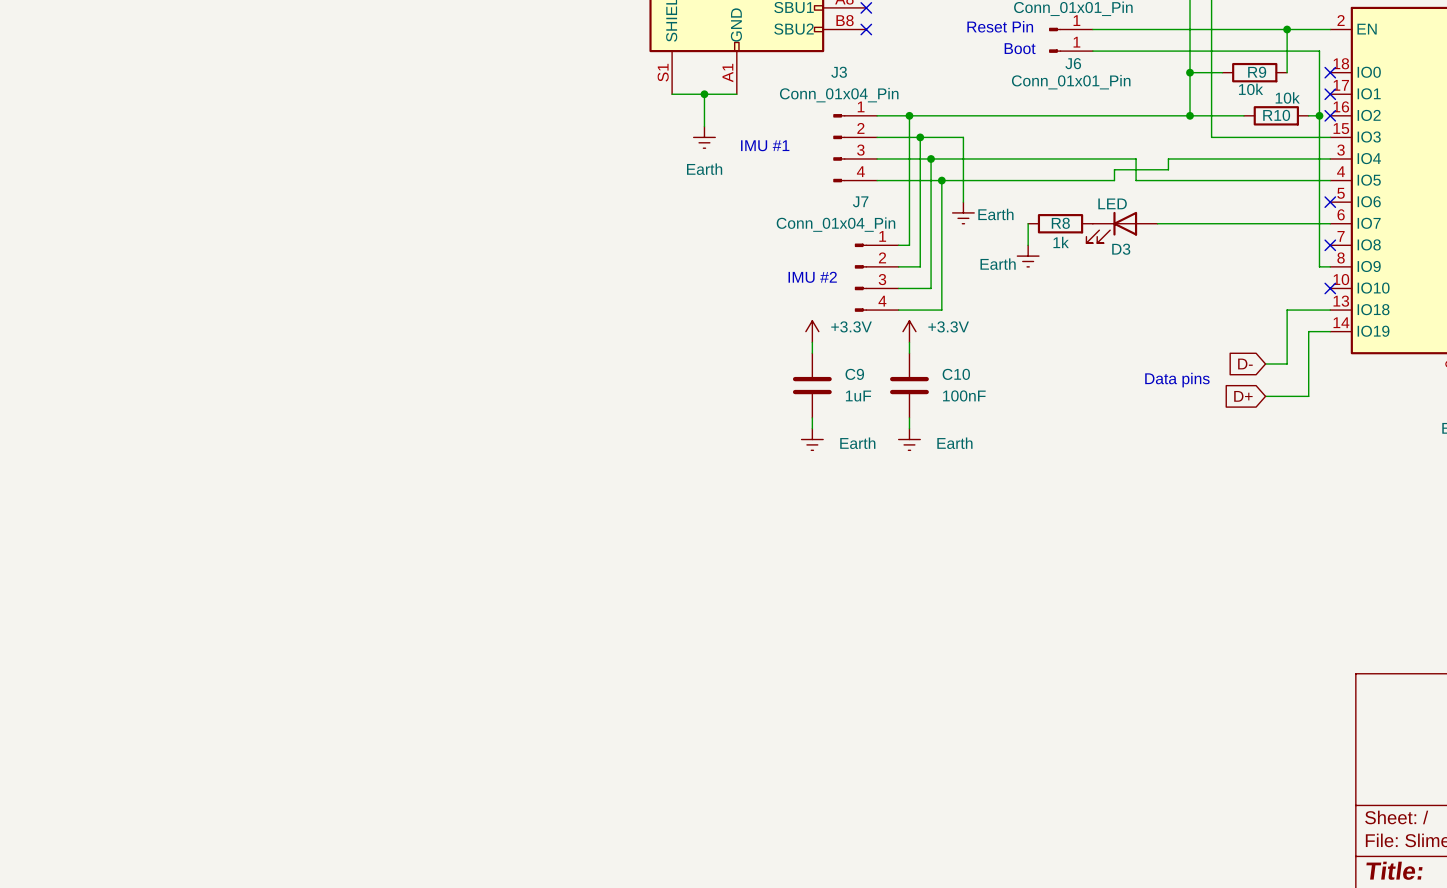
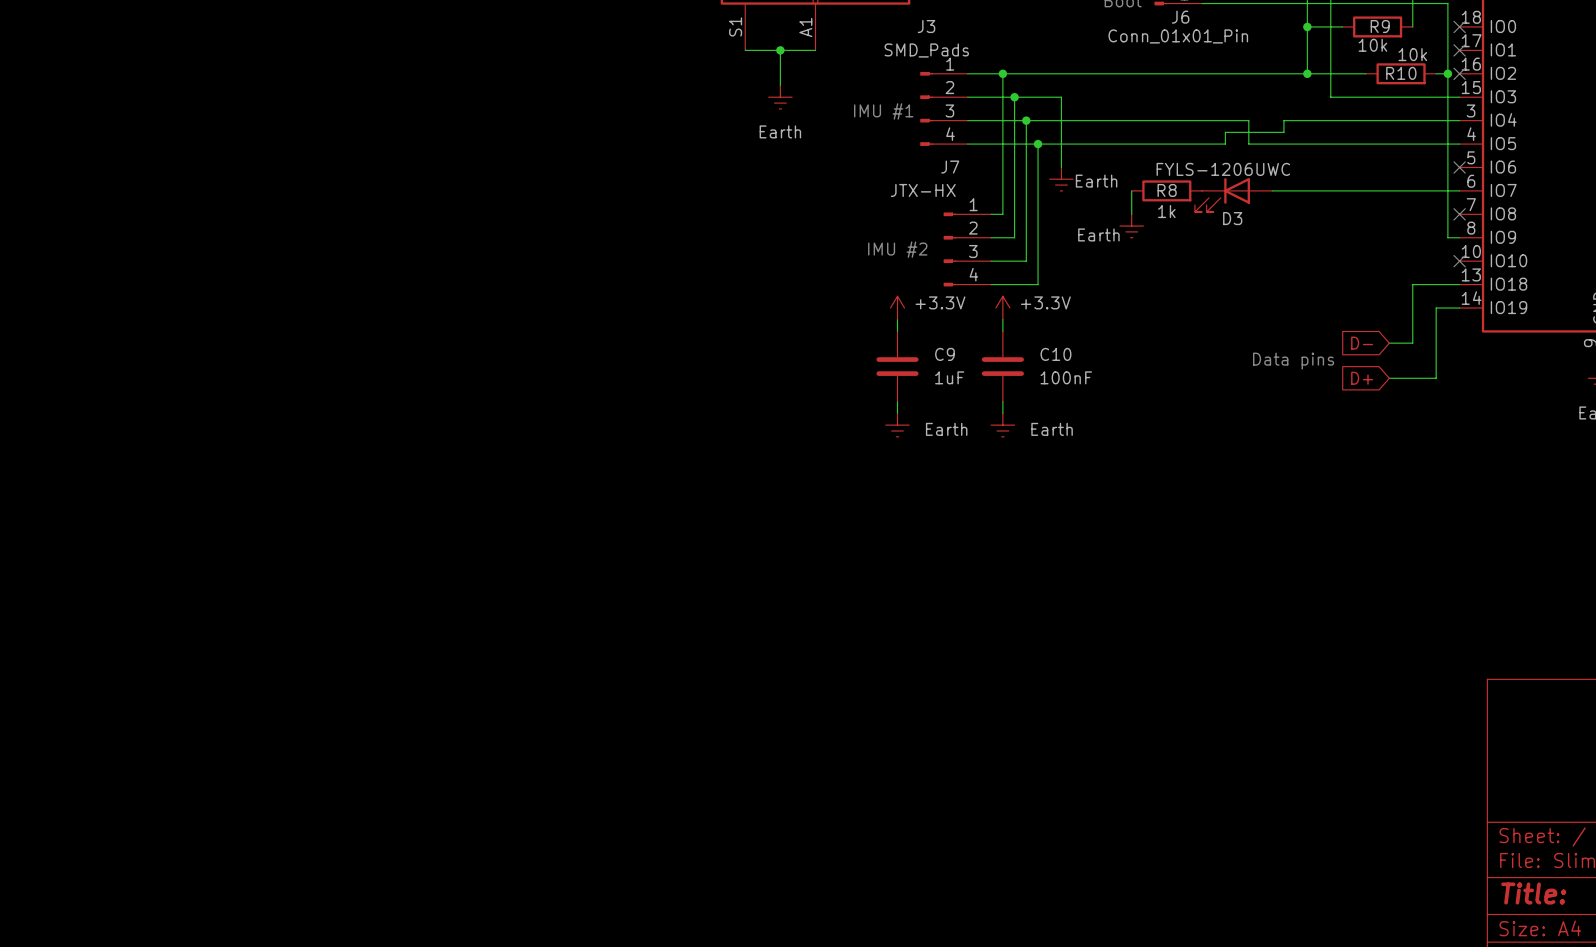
J3 value: Conn_01x04_Pin (839, 95) -> SMD_Pads (926, 50)
text position: IMU #1 (765, 145) -> IMU #1 (883, 111)
D3 value: LED (1112, 203) -> FYLS-1206UWC (1223, 169)
J7 value: Conn_01x04_Pin (835, 224) -> JTX-HX (923, 190)

